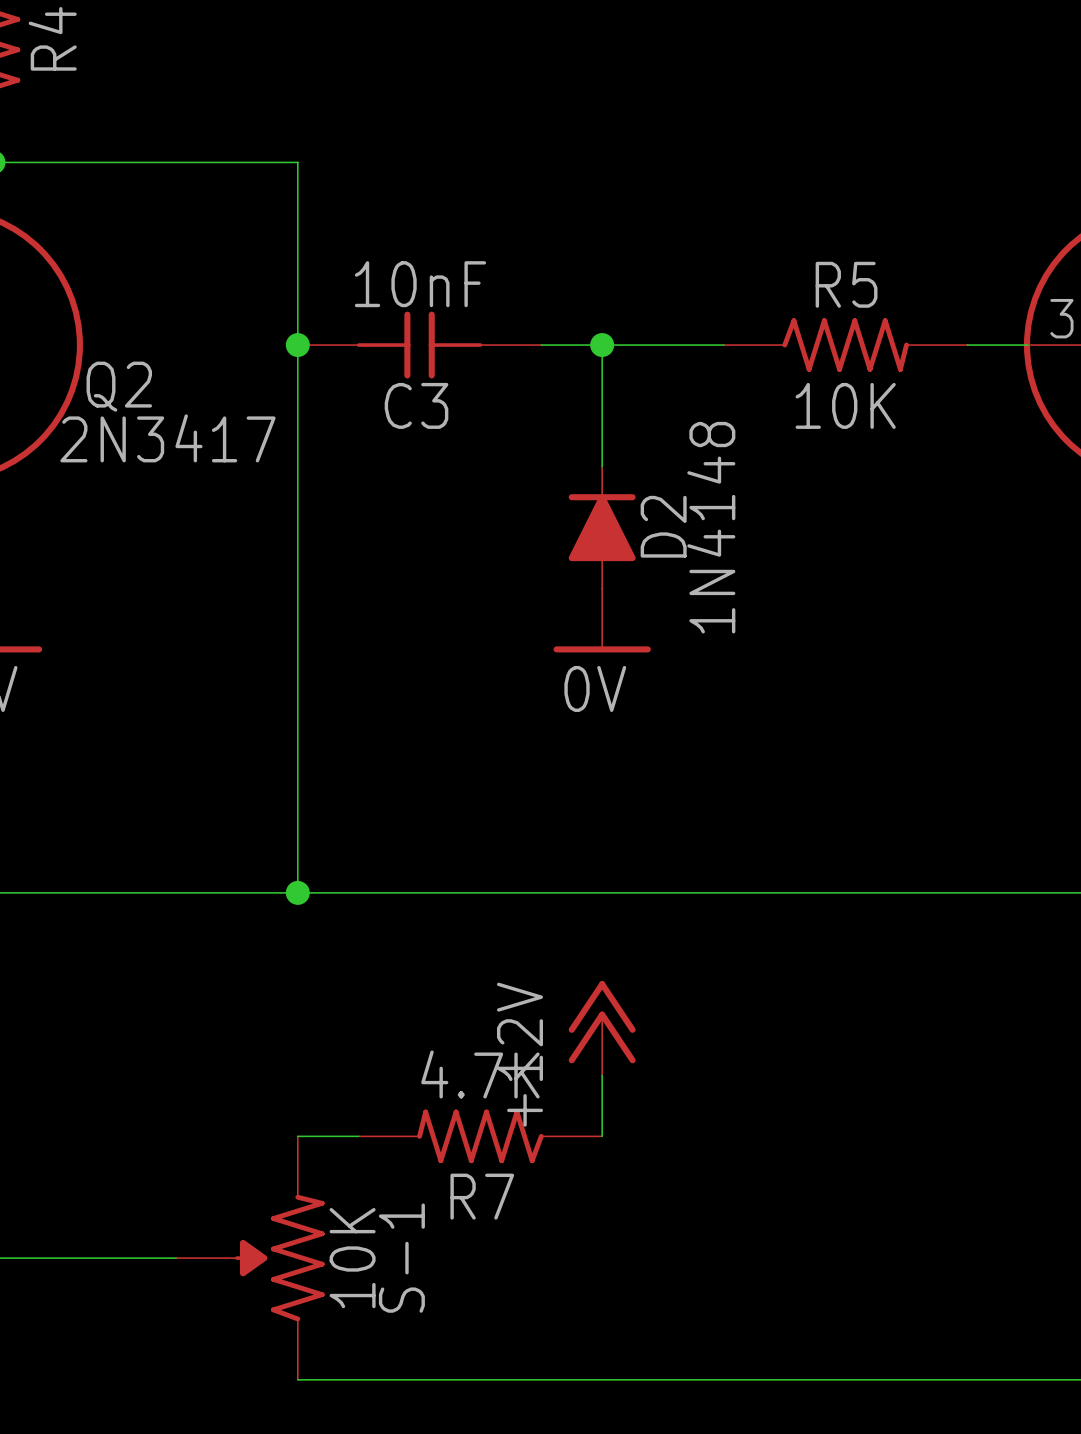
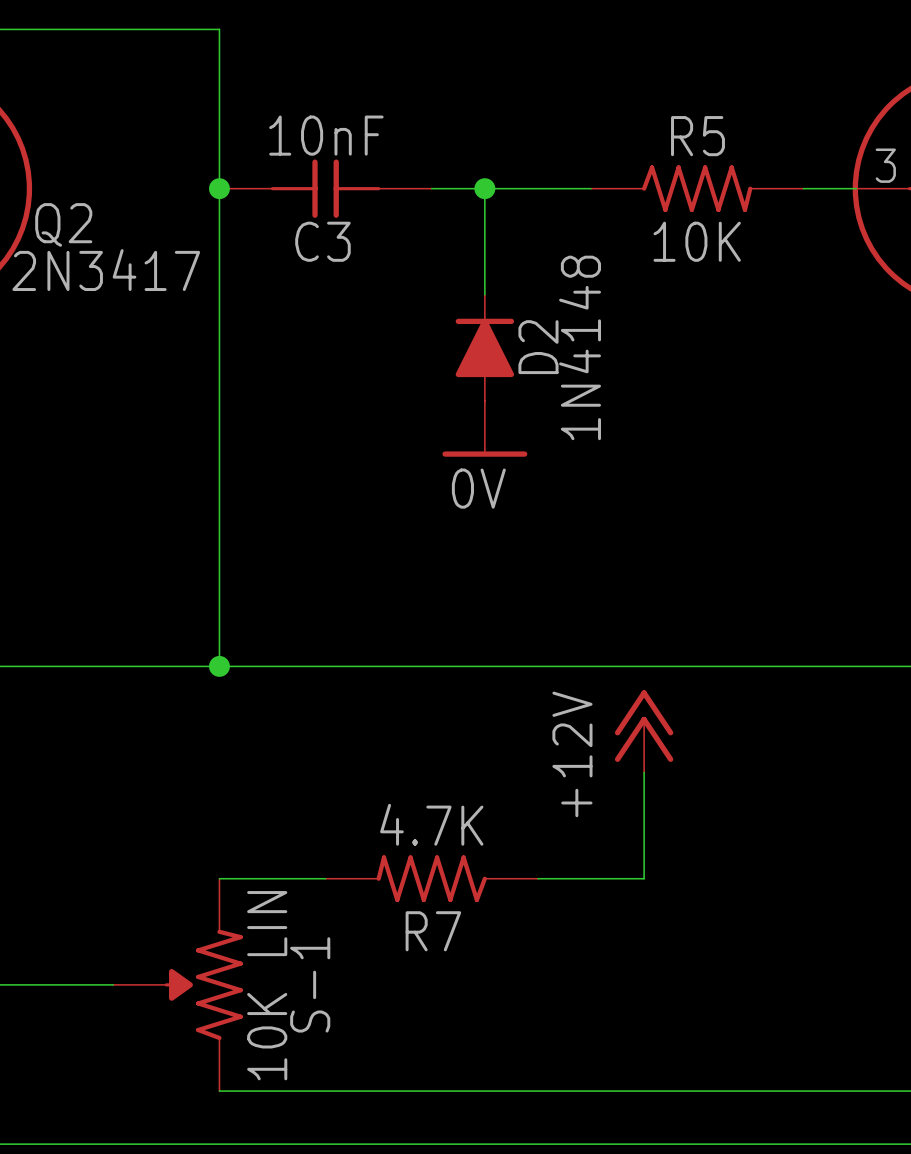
wire: none -> (644, 772) (644, 878) (537, 878)
power symbol position: +12V (602, 1028) -> +12V (644, 731)
wire: (602, 1075) (602, 1136) -> none
R7 position: (480, 1136) -> (431, 878)
S-1 value: 10K (352, 1258) -> 10K LIN (267, 985)

